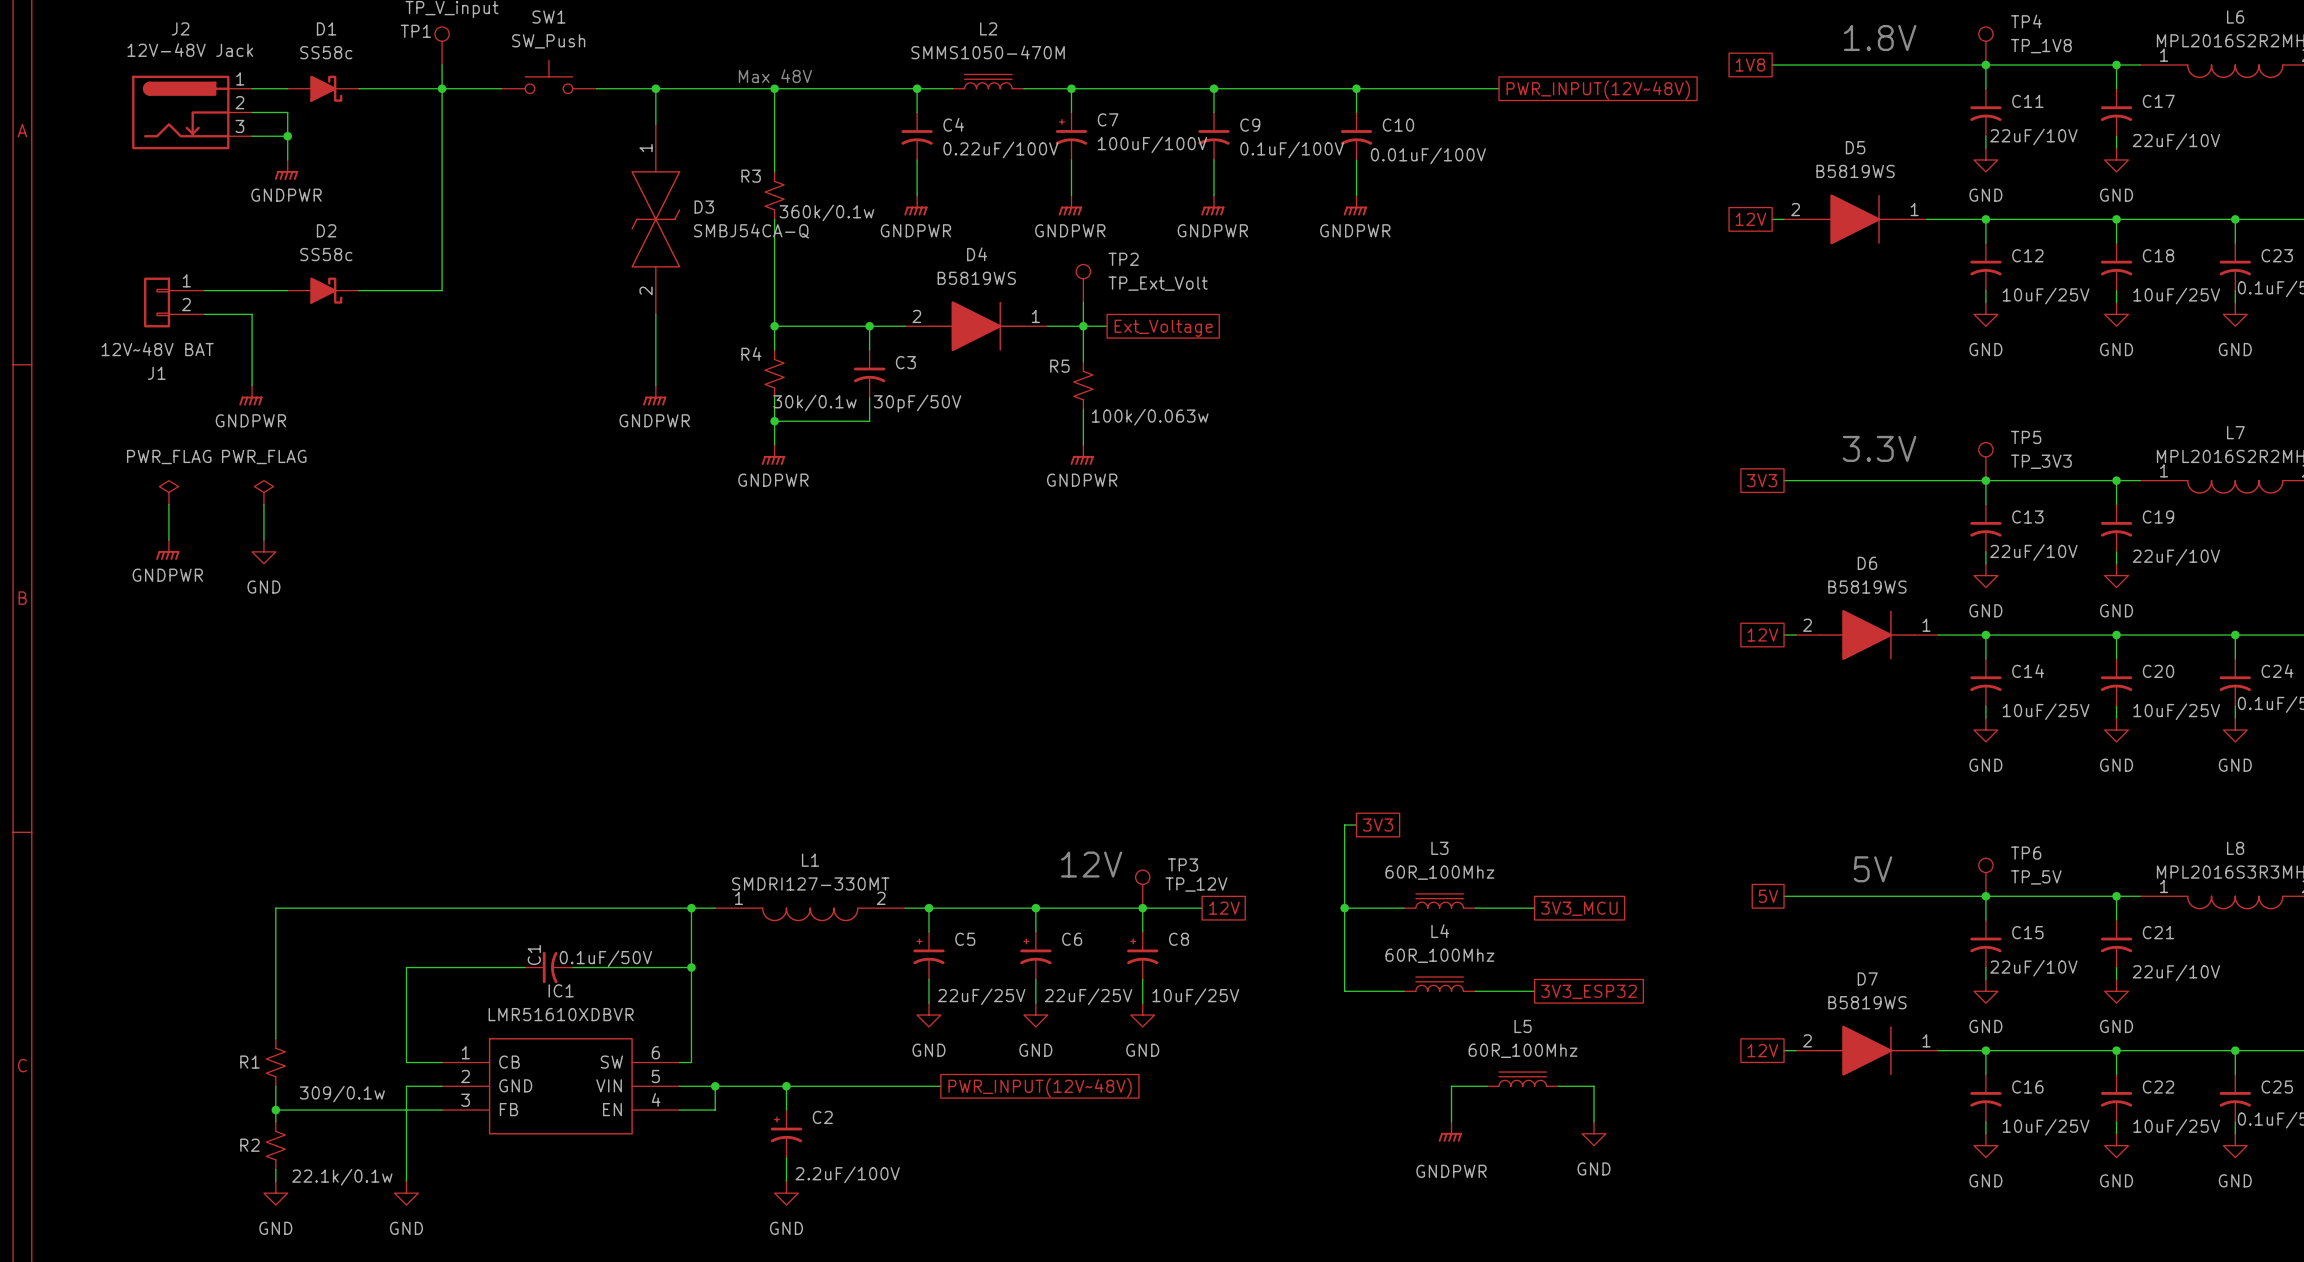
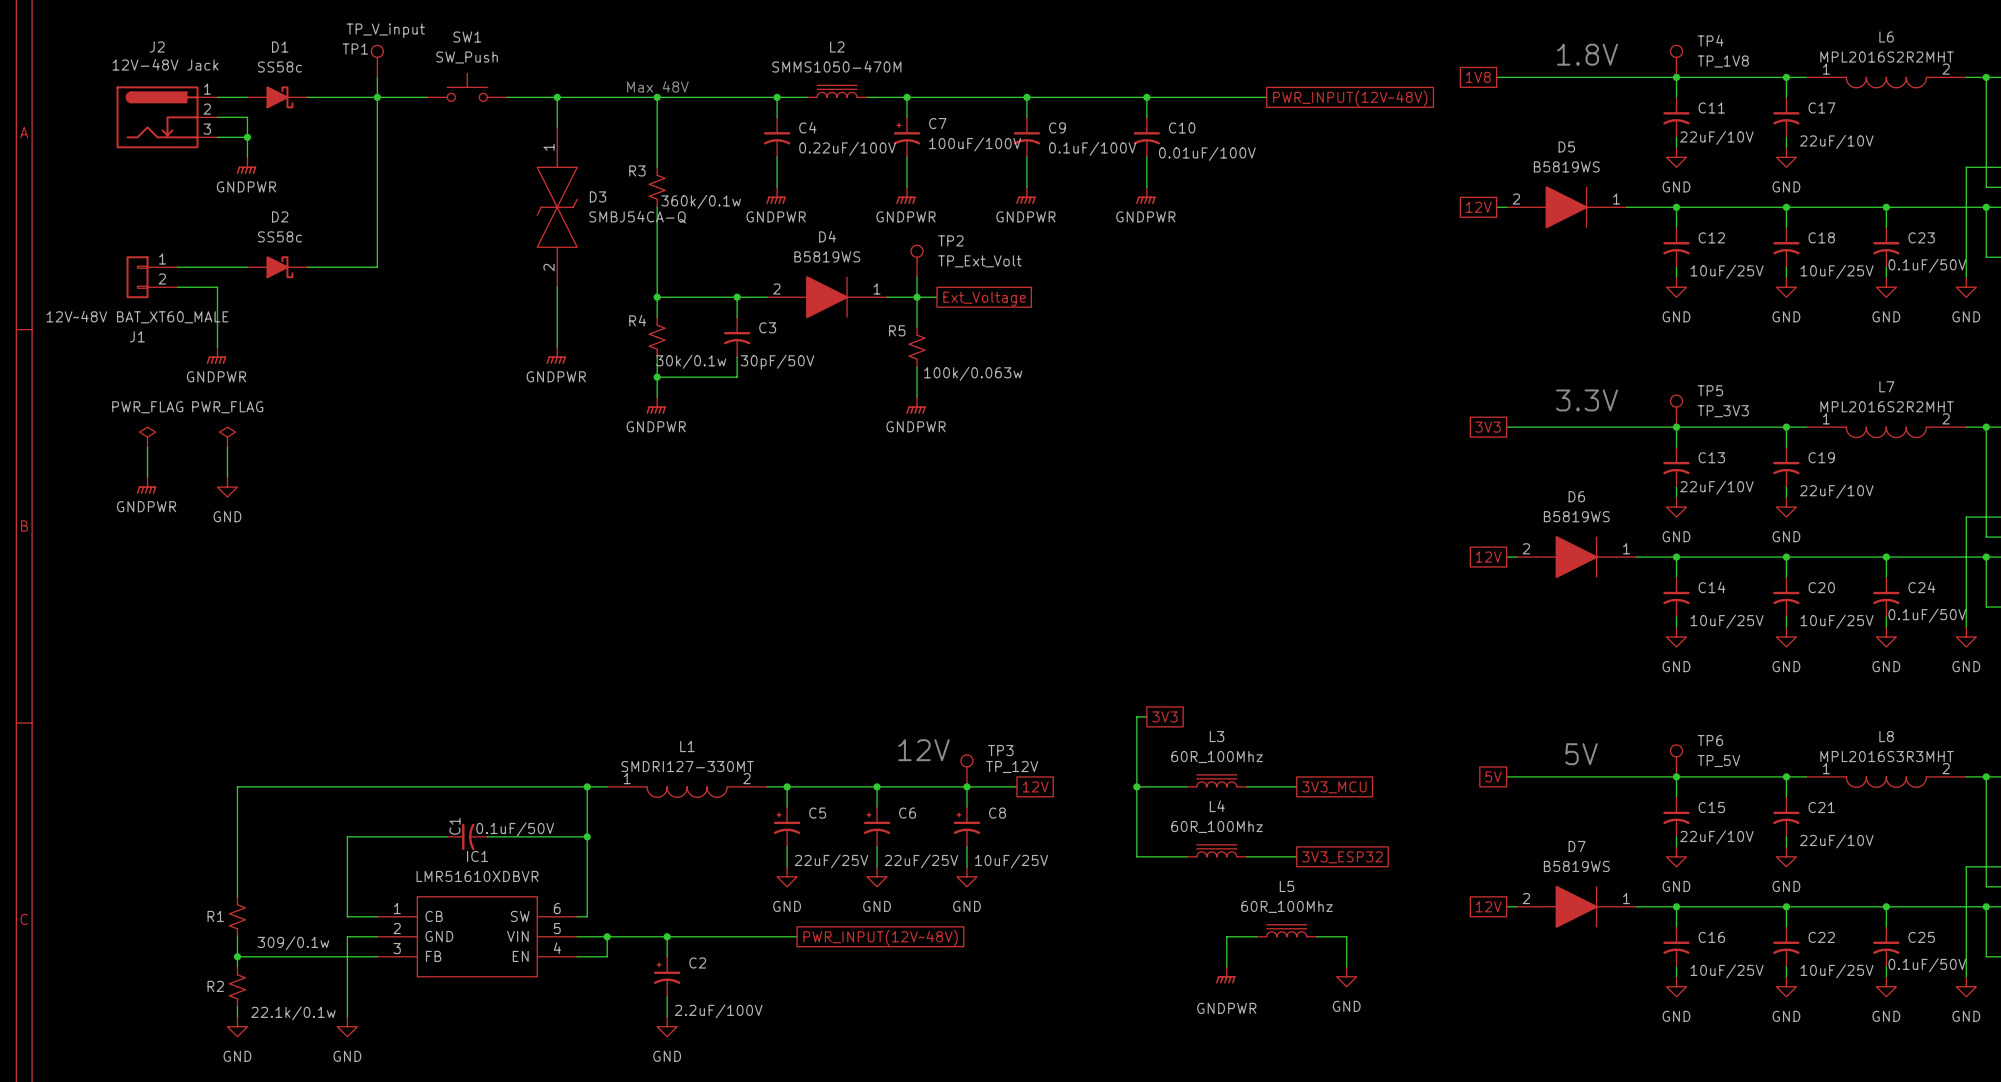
J1 value: 12V~48V BAT (157, 349) -> 12V~48V BAT_XT60_MALE (137, 317)

